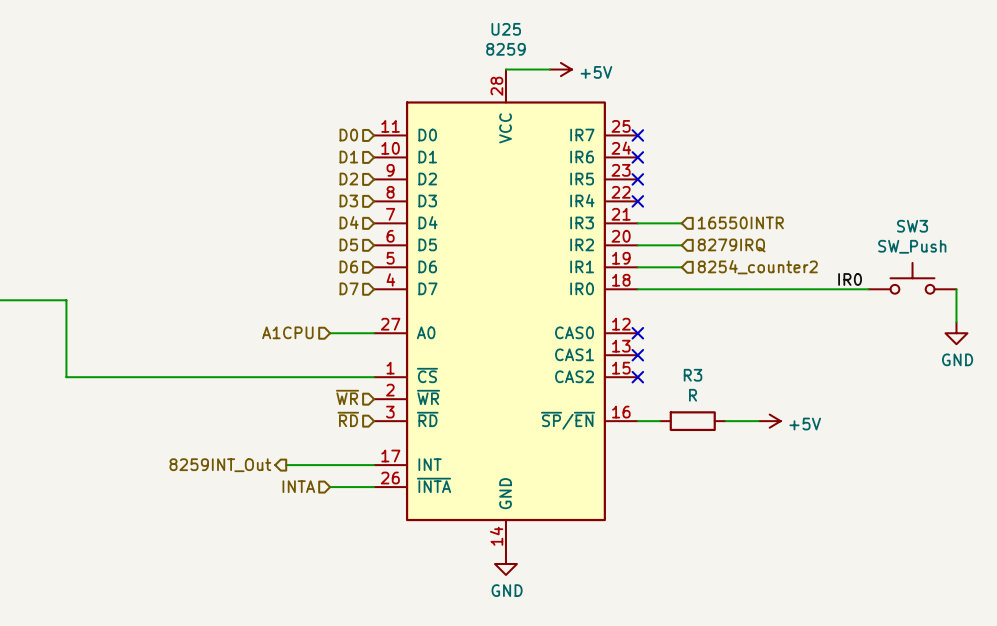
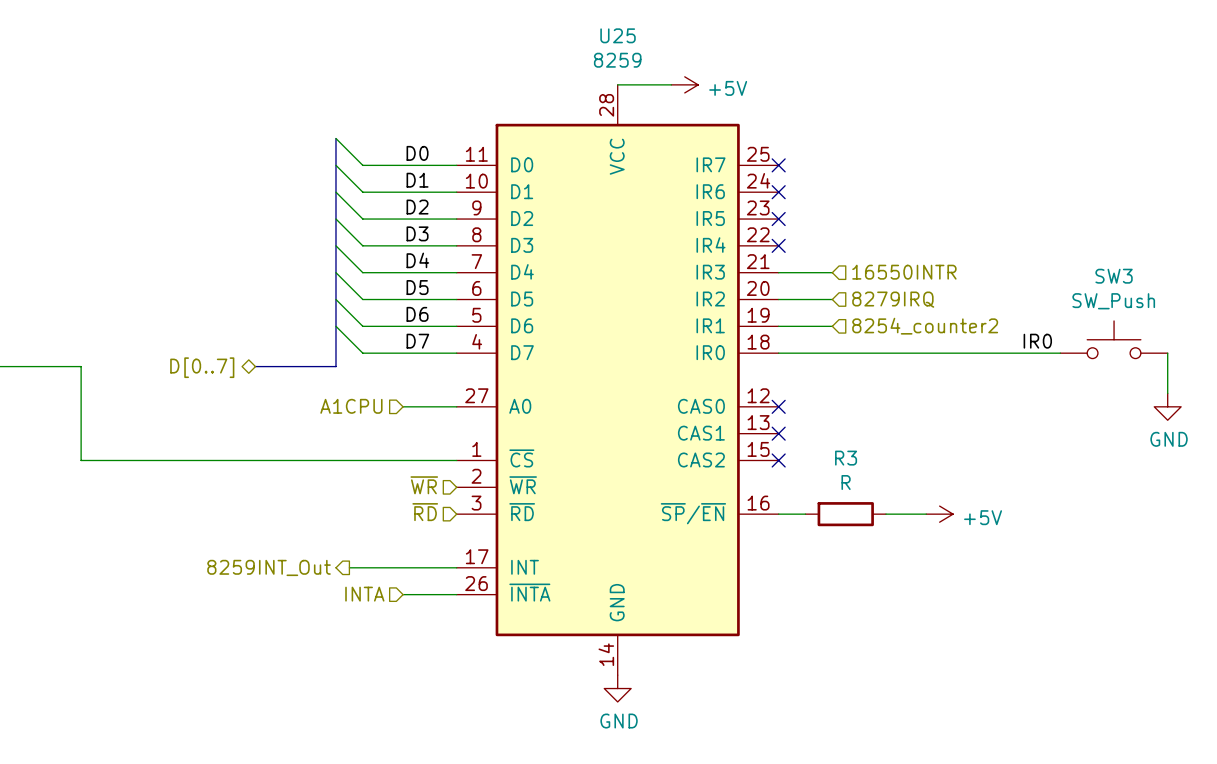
wire: none -> (335, 138) (362, 165) (456, 165)
bus: none -> (335, 138) (335, 366) (255, 366)
label: none -> D0 (417, 153)
wire: none -> (335, 165) (362, 192) (456, 192)
hierarchical label: D0 (348, 135) -> none
label: none -> D1 (417, 180)
wire: none -> (335, 192) (362, 219) (456, 219)
hierarchical label: D1 (348, 157) -> none
label: none -> D2 (417, 207)
hierarchical label: D2 (348, 178) -> none
wire: none -> (335, 219) (362, 245) (456, 245)
label: none -> D3 (417, 233)
hierarchical label: D3 (348, 200) -> none
wire: none -> (335, 245) (362, 272) (456, 272)
label: none -> D4 (417, 260)
hierarchical label: D4 (349, 222) -> none
wire: none -> (335, 272) (362, 299) (456, 299)
label: none -> D5 (417, 287)
hierarchical label: D5 (348, 244) -> none
wire: none -> (335, 299) (362, 326) (456, 326)
label: none -> D6 (417, 314)
hierarchical label: D6 (348, 266) -> none
wire: none -> (335, 326) (362, 353) (456, 353)
label: none -> D7 (417, 341)
hierarchical label: D7 (349, 288) -> none
hierarchical label: none -> D[0..7] (202, 367)

